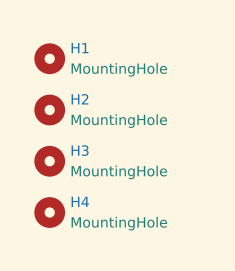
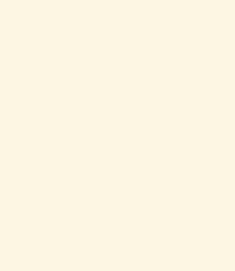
H1: MountingHole (49, 58) -> none
H2: MountingHole (49, 110) -> none
H3: MountingHole (49, 161) -> none
H4: MountingHole (49, 212) -> none

